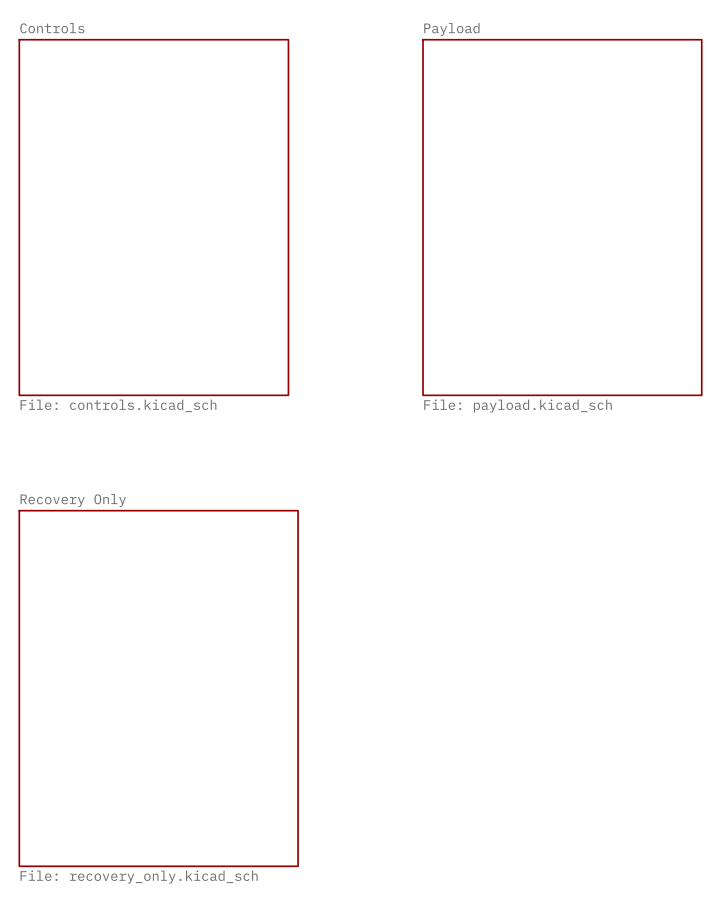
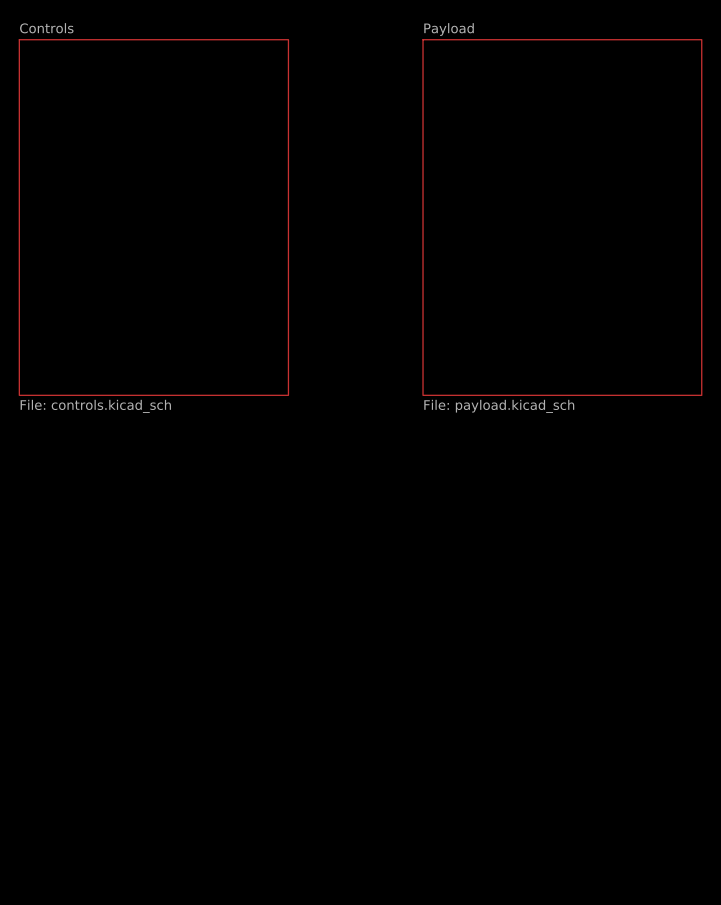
sheet Recovery Only: File: recovery_only.kicad_sch (158, 688) -> none

